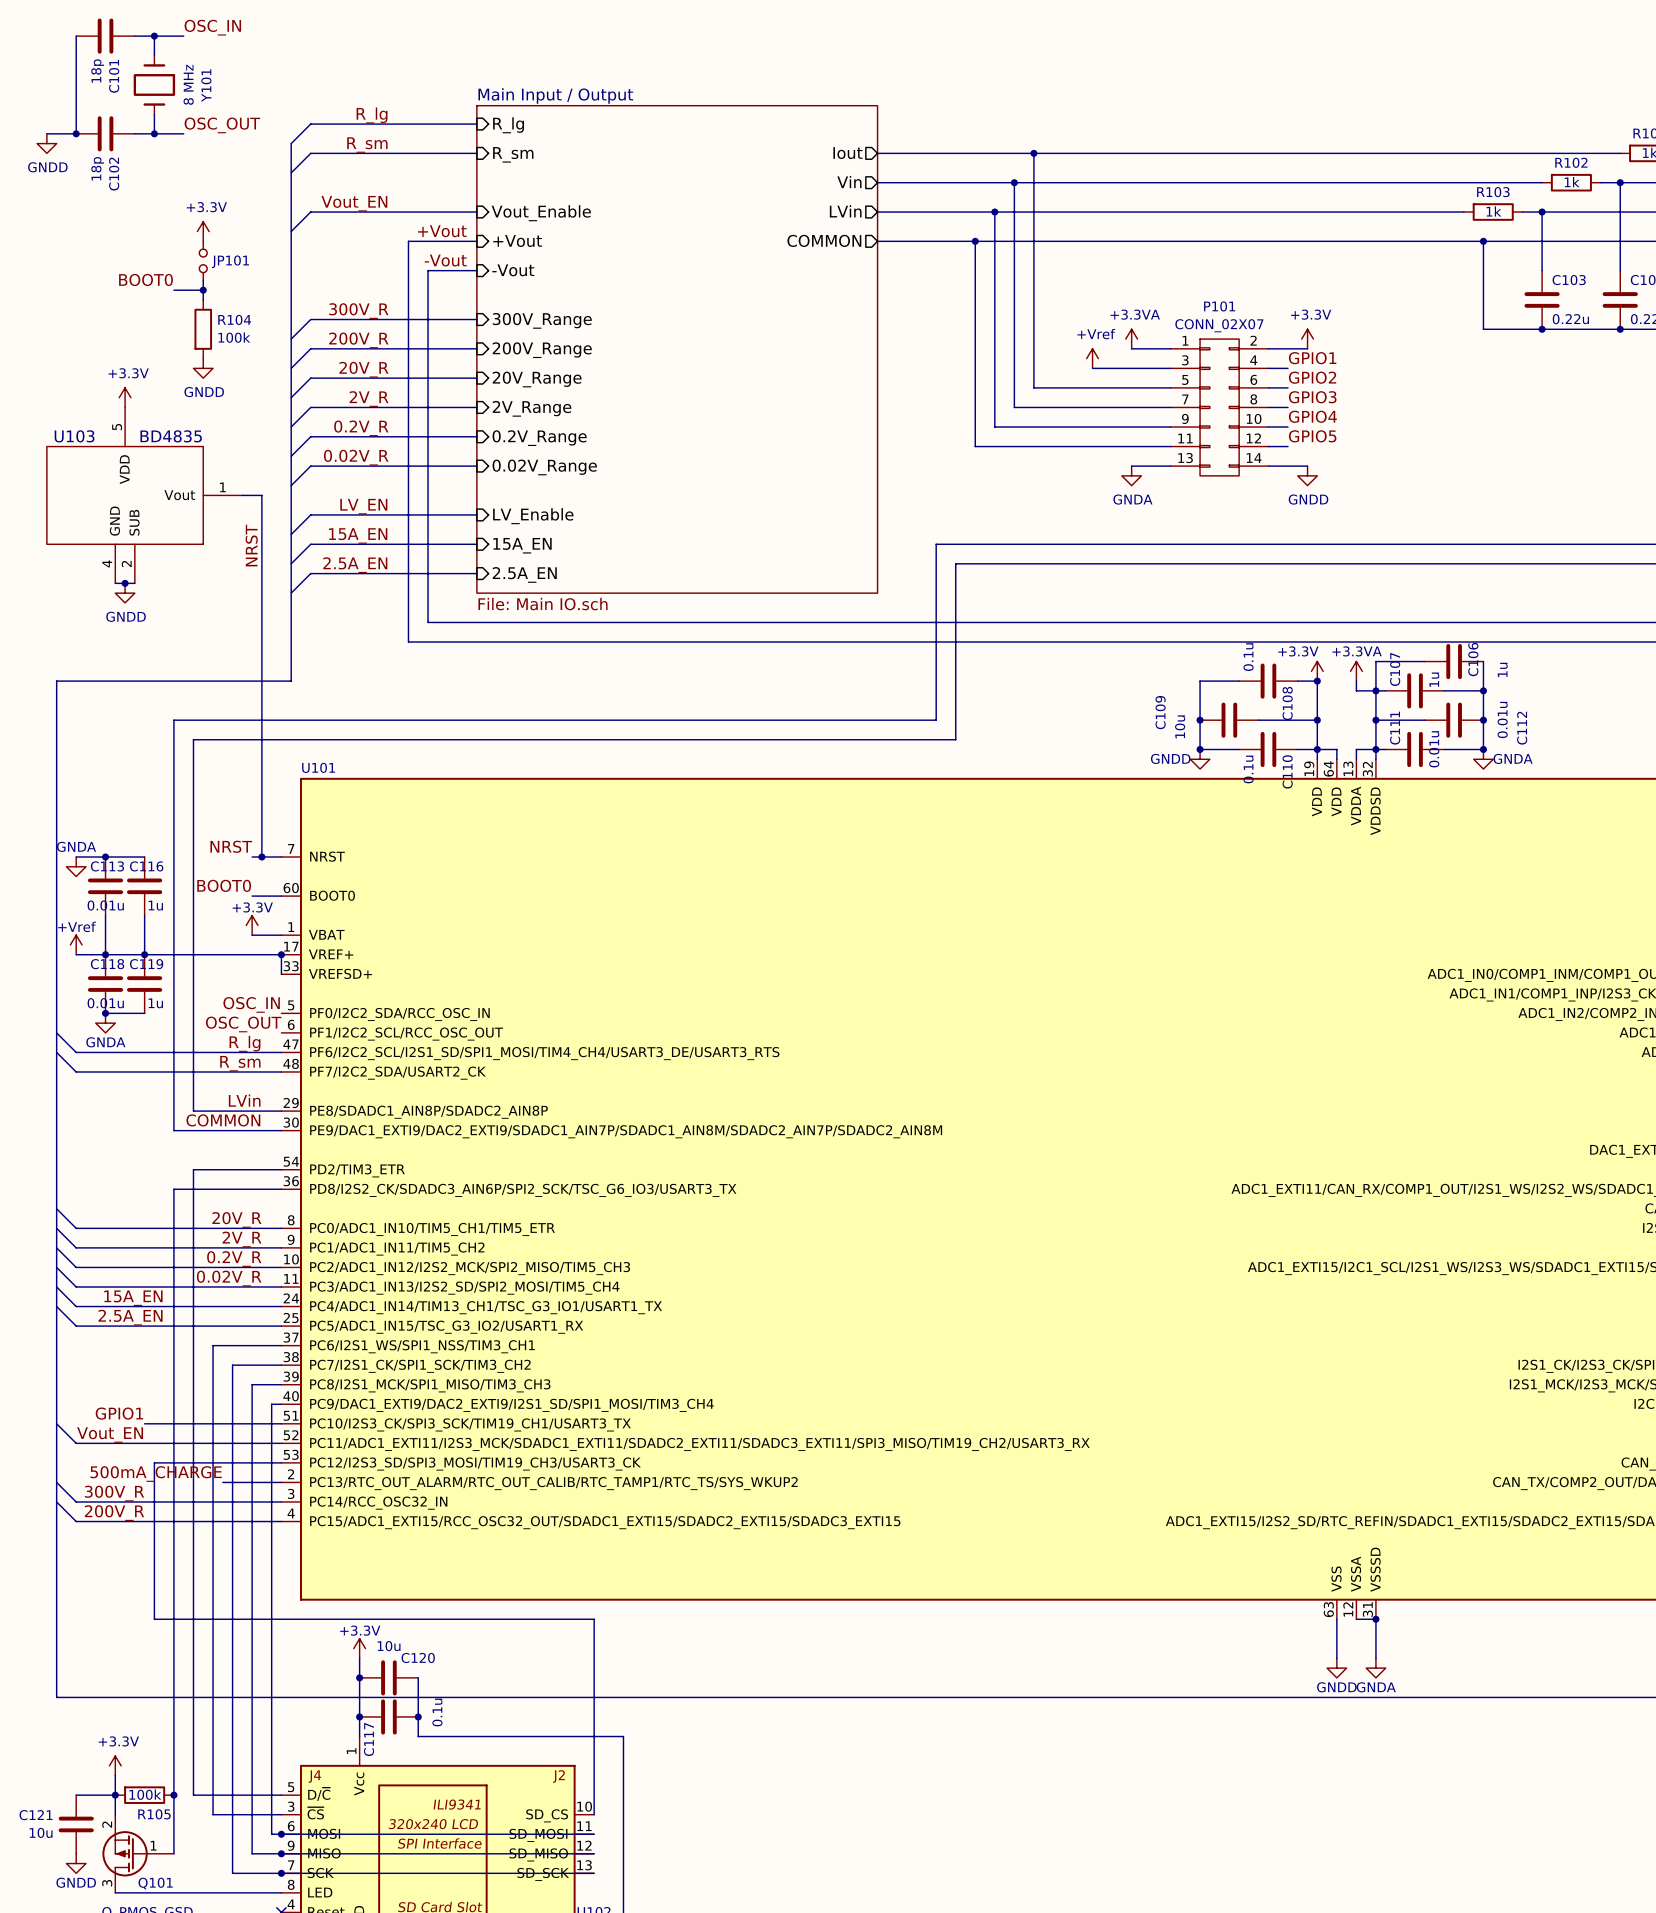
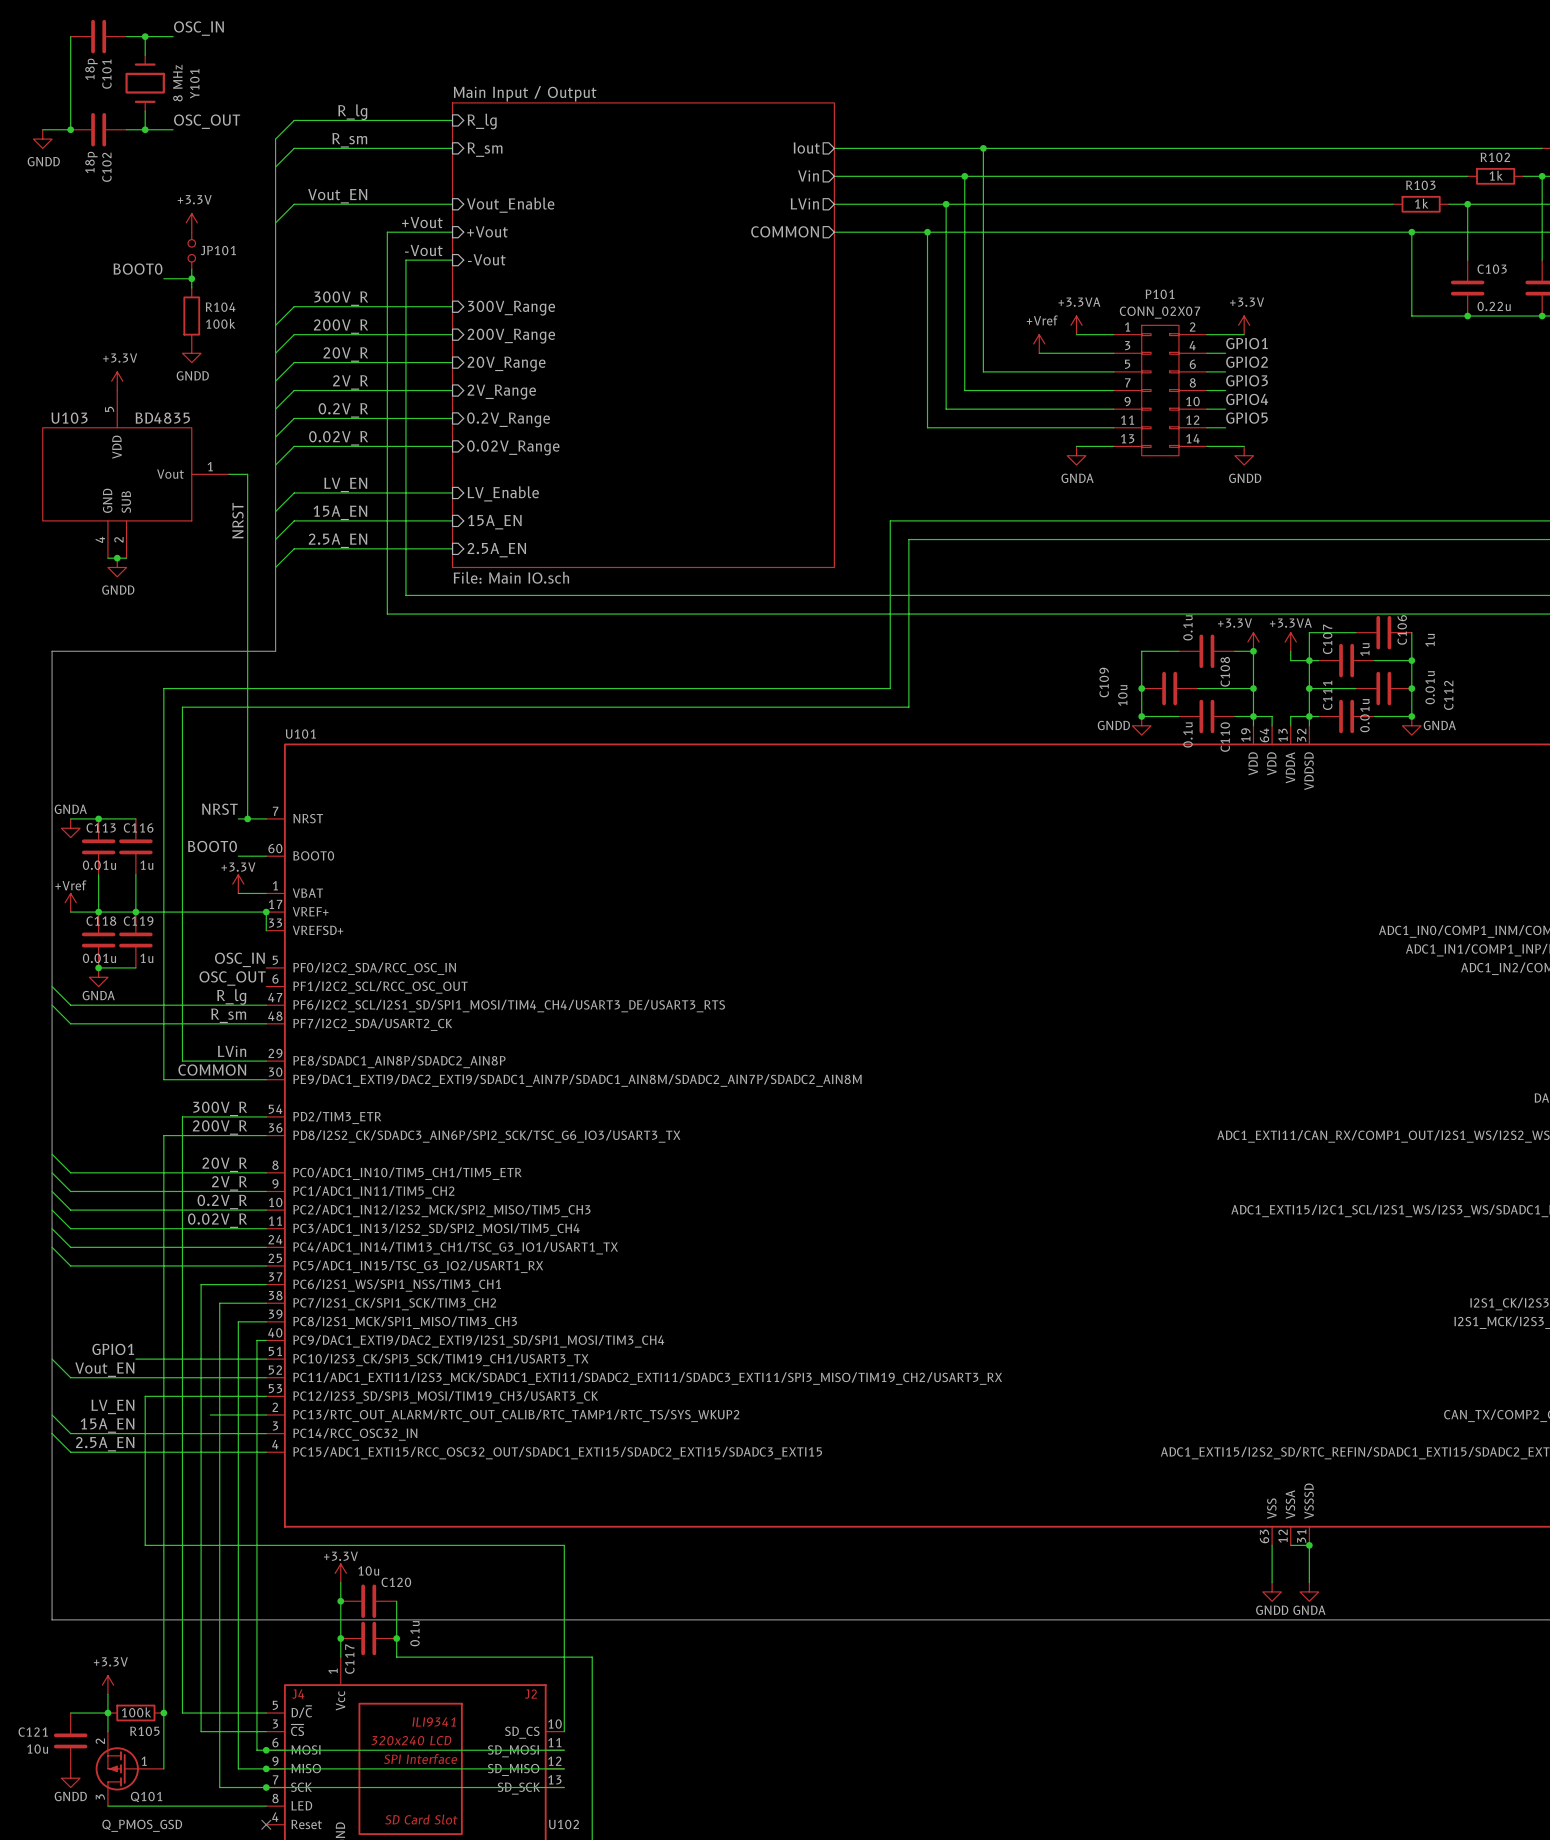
label: none -> 300V_R (220, 1108)
label: none -> 200V_R (220, 1127)
label: 15A_EN (133, 1298) -> none
label: 2.5A_EN (130, 1317) -> none
label: none -> LV_EN (112, 1406)
label: 500mA_CHARGE (156, 1474) -> none
label: 300V_R (114, 1493) -> 15A_EN (107, 1425)
label: 200V_R (114, 1513) -> 2.5A_EN (105, 1444)

